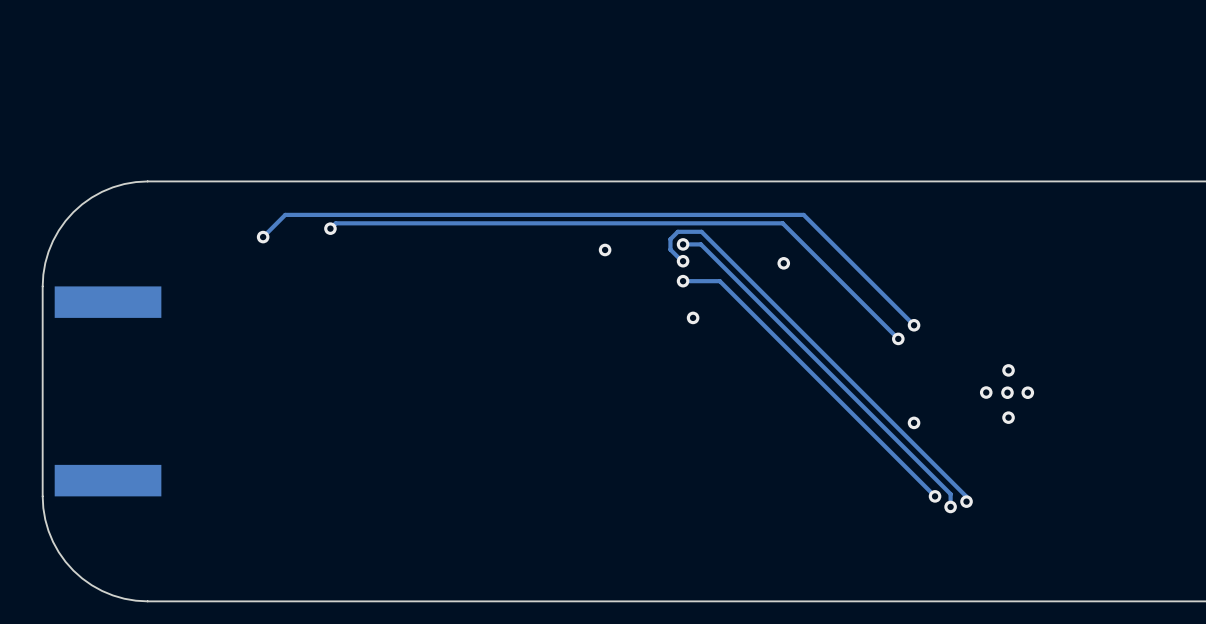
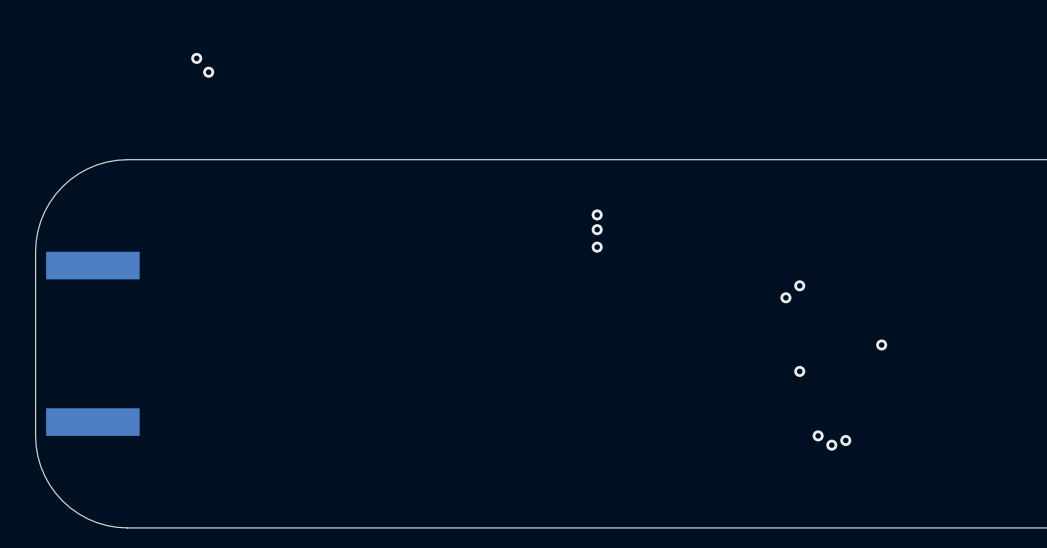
via: none -> (196, 58)
via: none -> (208, 72)
track: (330, 228) (335, 223) (782, 223) (898, 338) -> none
via: (330, 228) -> none
track: (263, 237) (285, 214) (803, 214) (914, 325) -> none
via: (263, 237) -> none
track: (683, 244) (700, 244) (950, 494) (950, 506) -> none
via: (605, 249) -> none
track: (683, 261) (670, 249) (670, 239) (677, 231) (701, 231) (966, 496) (966, 501) -> none
via: (783, 263) -> none
track: (683, 281) (719, 281) (935, 496) -> none
via: (693, 317) -> none
via: (1008, 370) -> none
via: (986, 392) -> none
via: (1027, 392) -> none
via: (1008, 417) -> none

